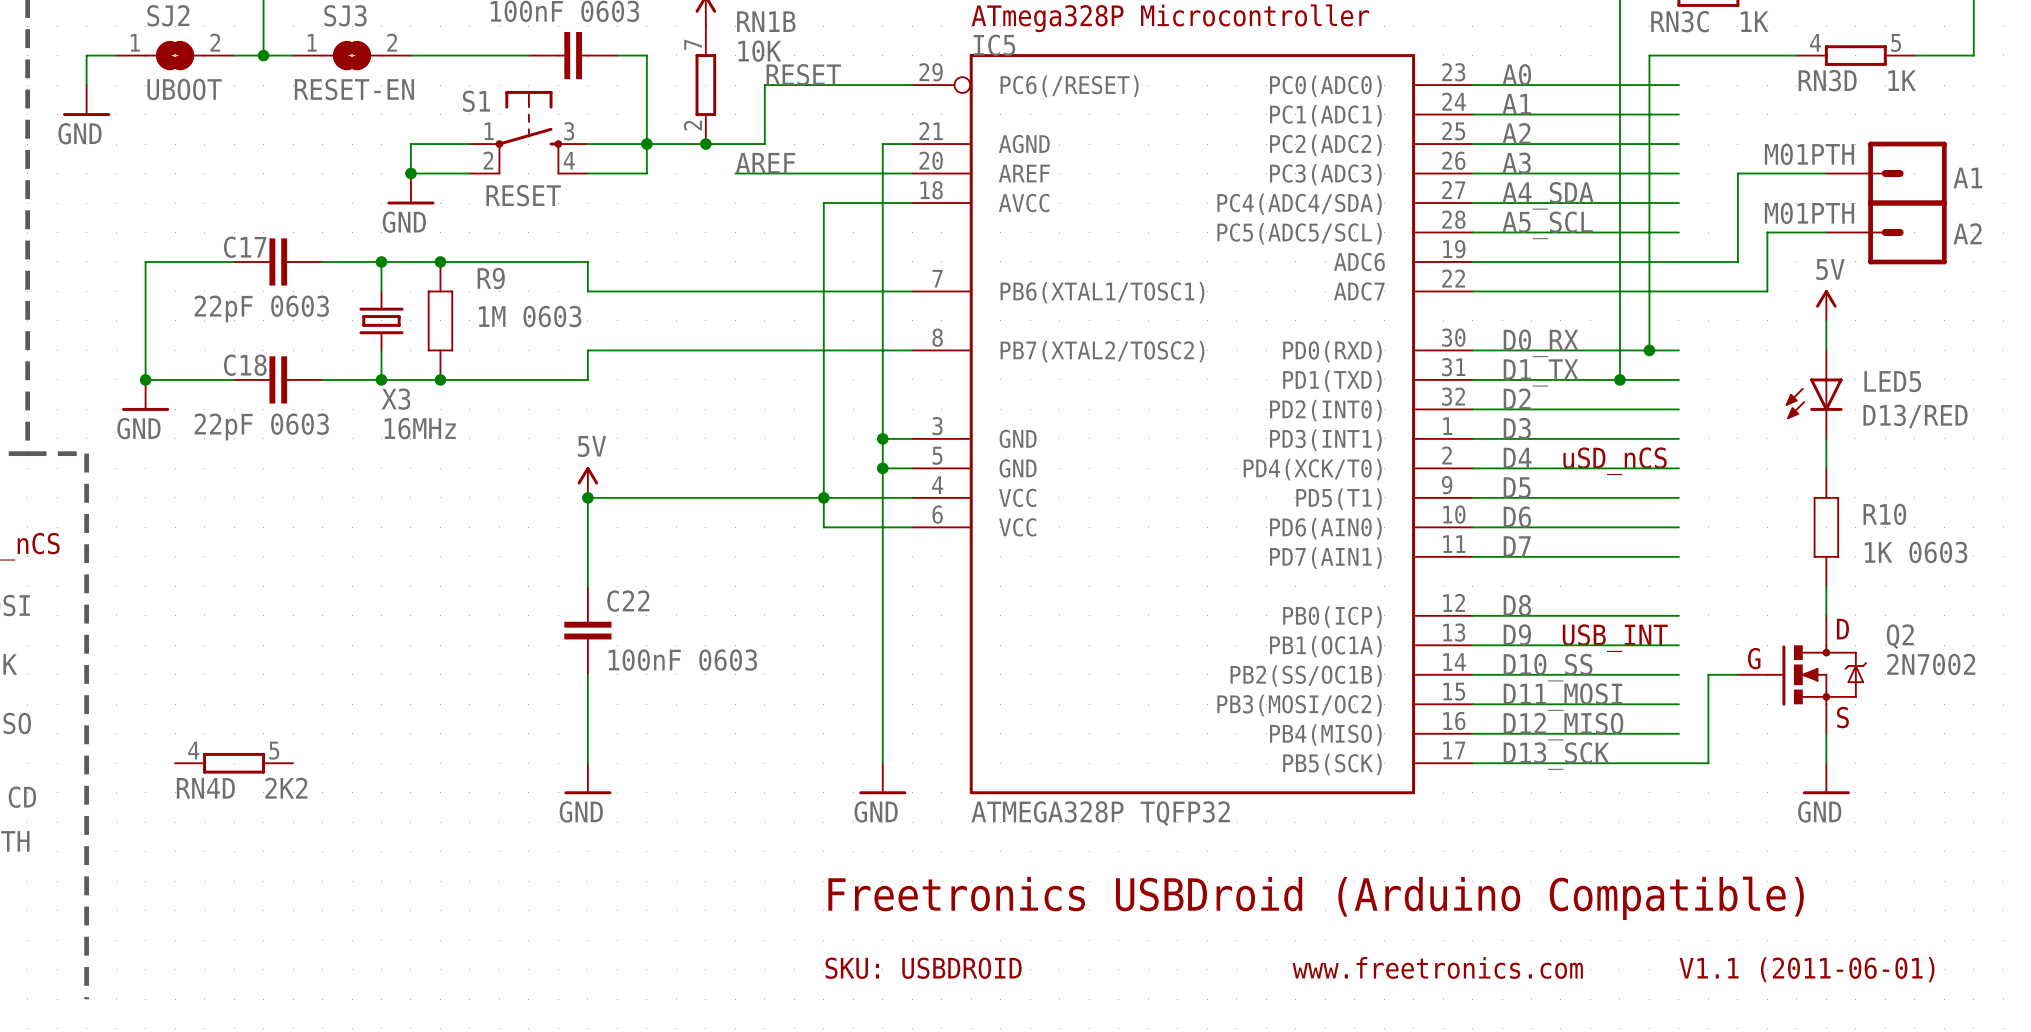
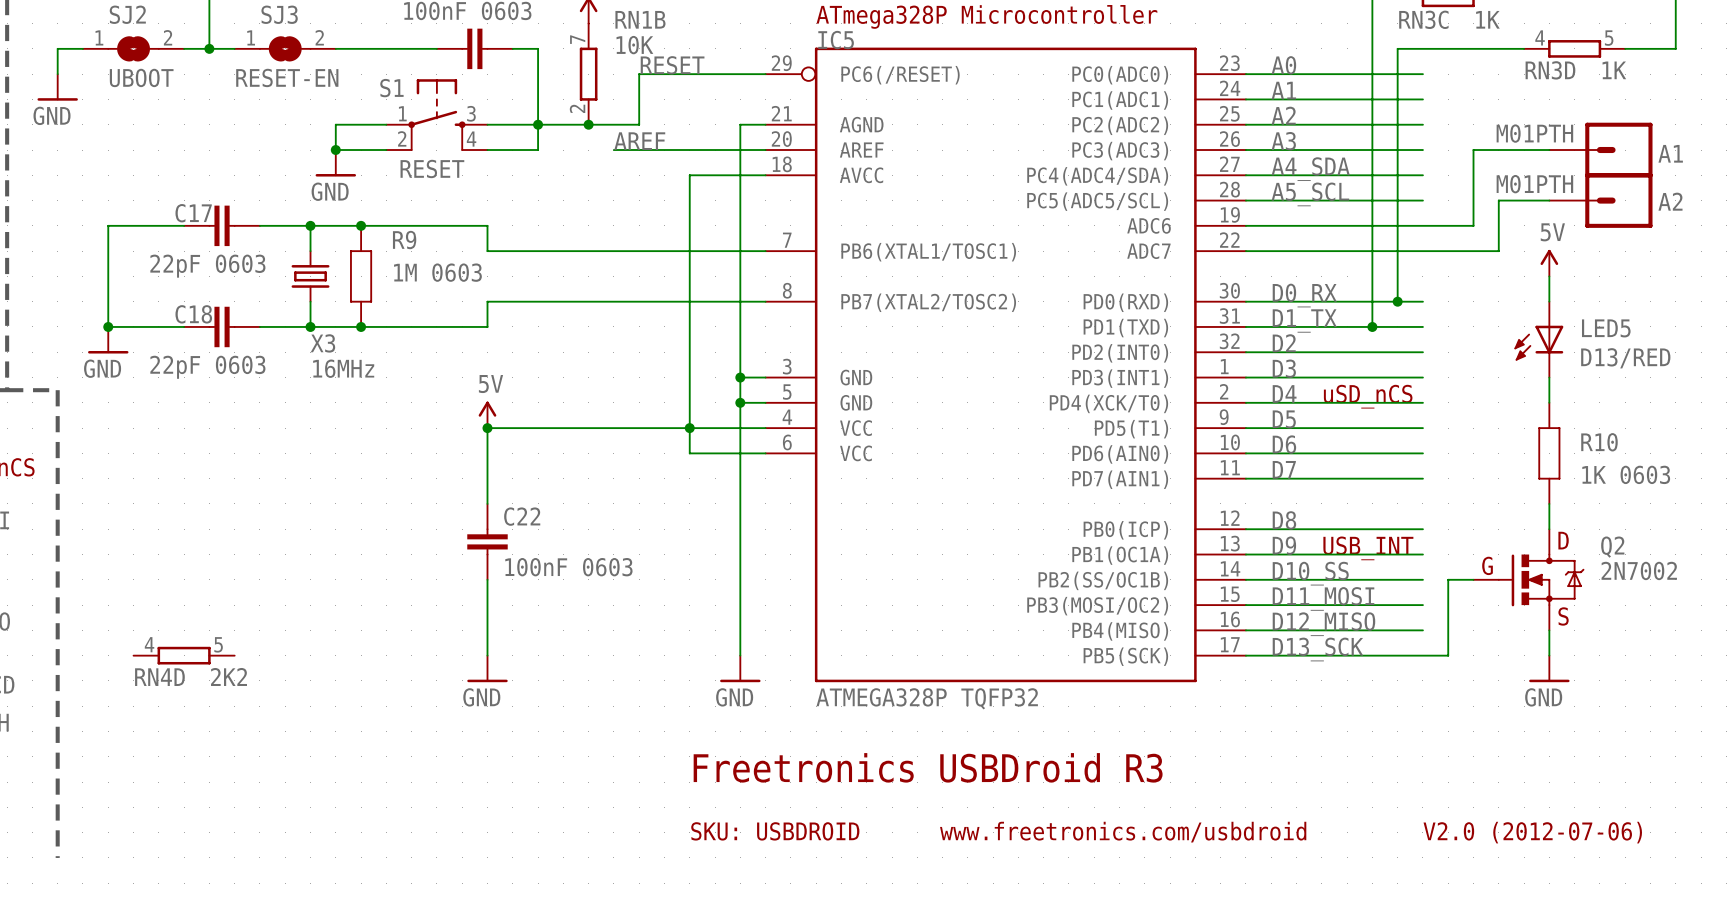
text: Freetronics USBDroid (Arduino Compatible) (1316, 898) -> Freetronics USBDroid R3 (928, 767)
text: www.freetronics.com (1437, 967) -> www.freetronics.com/usbdroid (1123, 832)
text: V1.1 (2011-06-01) (1807, 969) -> V2.0 (2012-07-06) (1532, 832)

